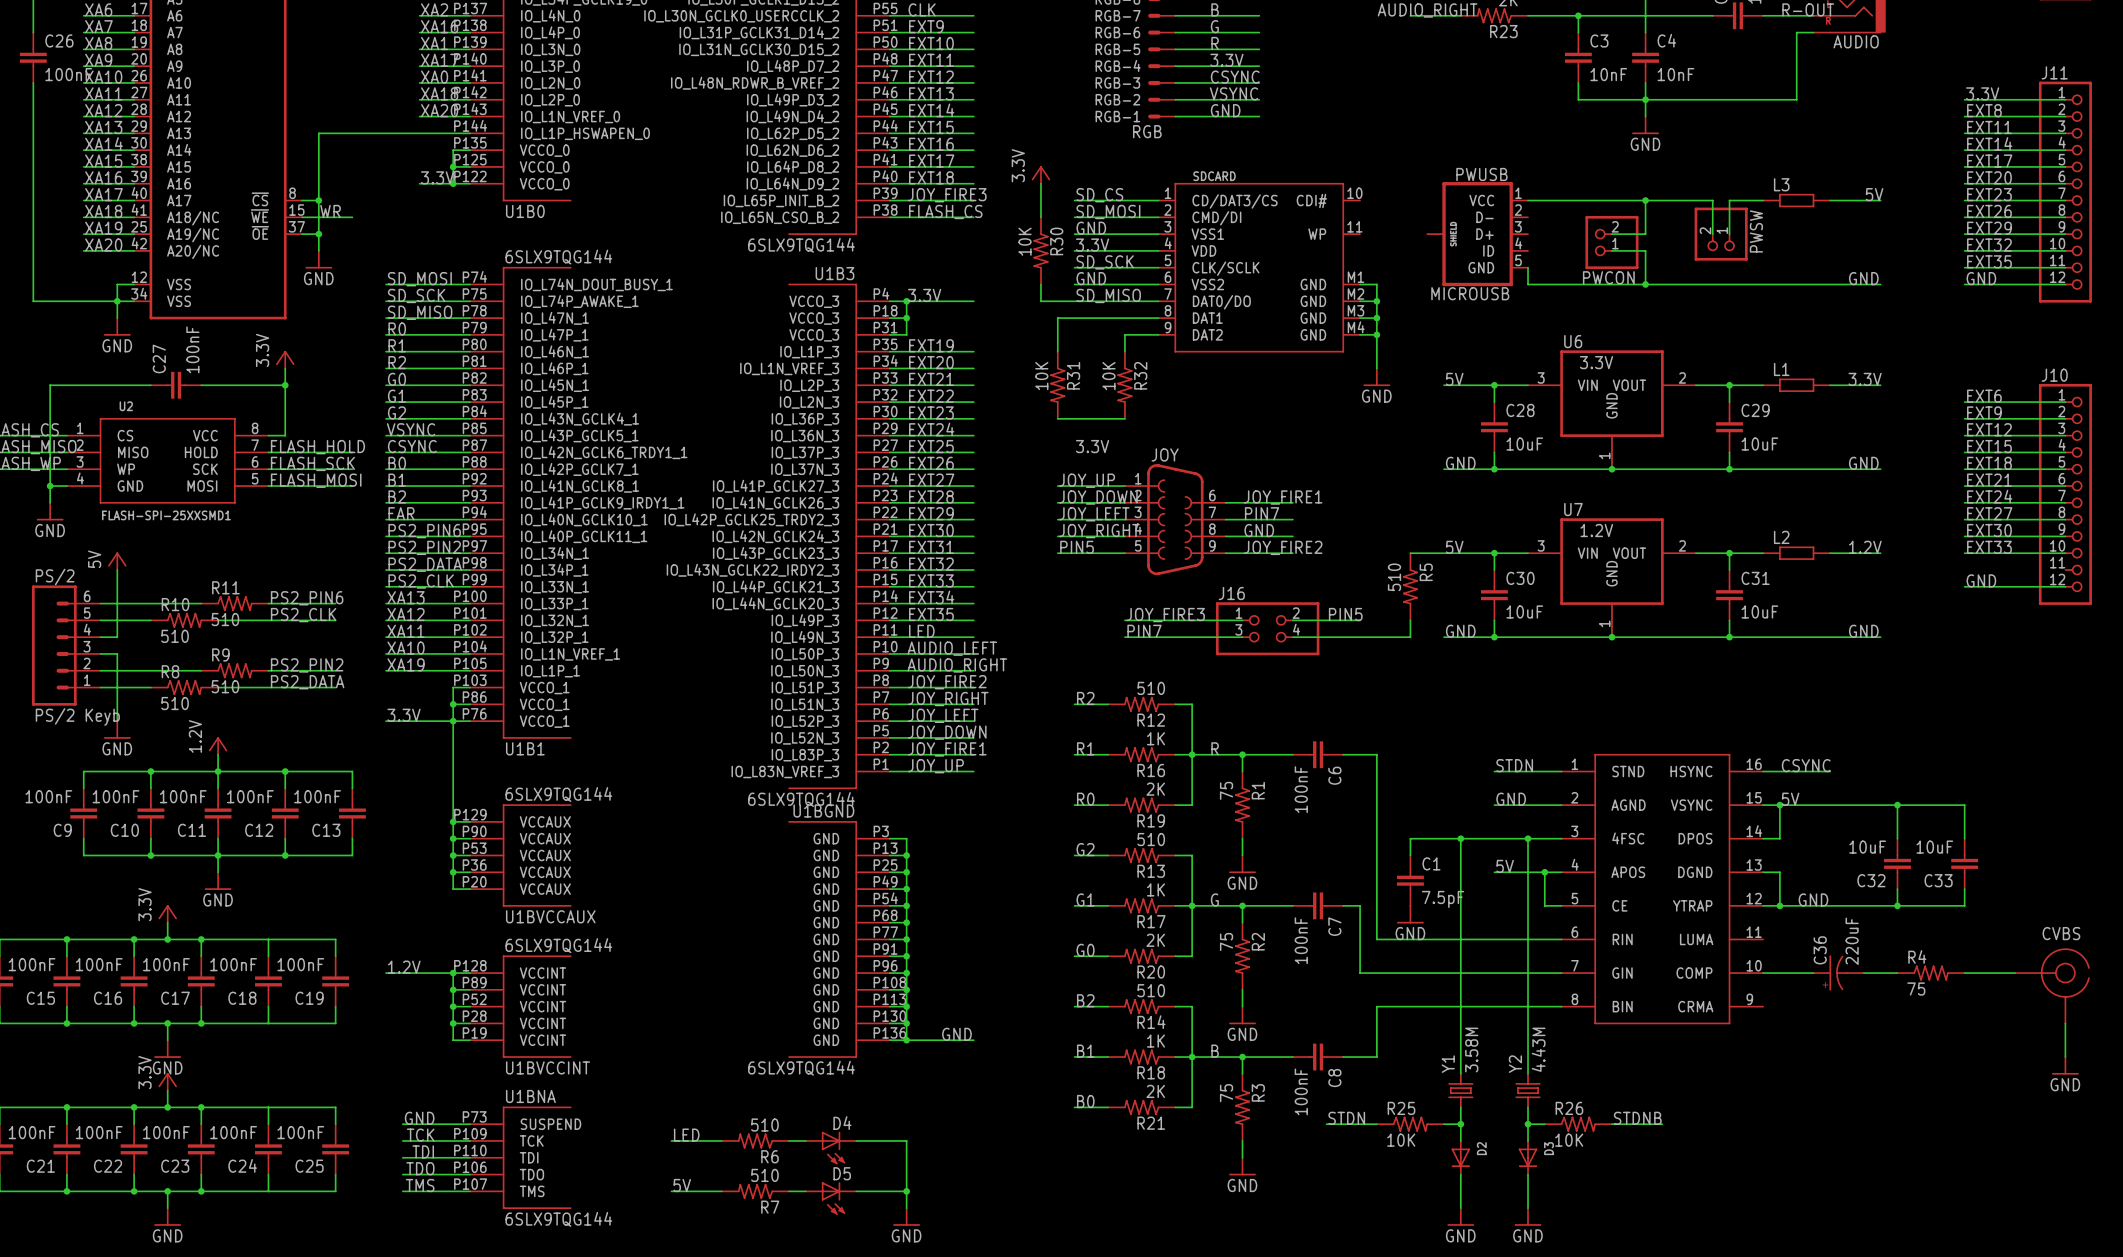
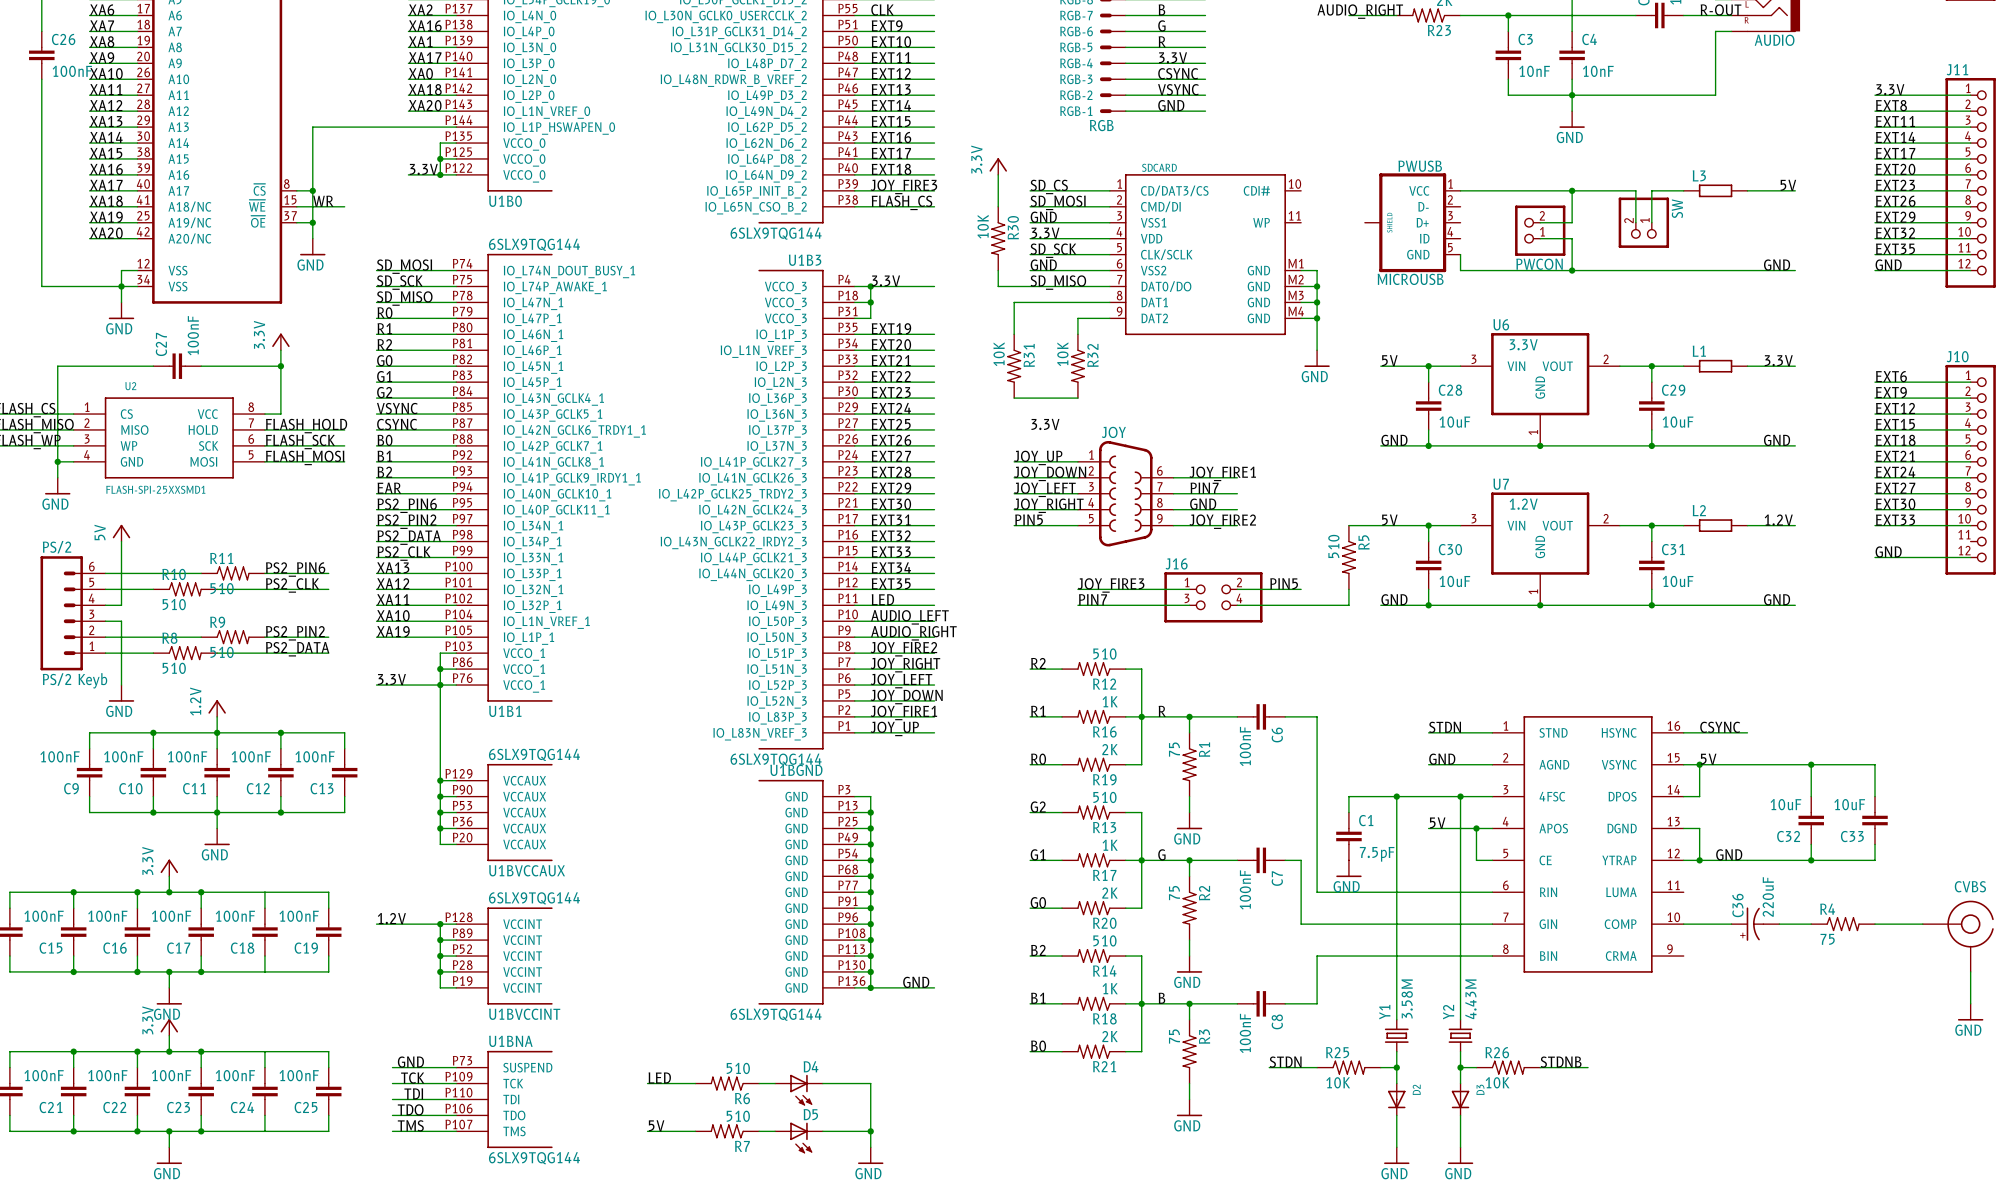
PWSW name: PWSW (1756, 231) -> SW (1677, 208)

